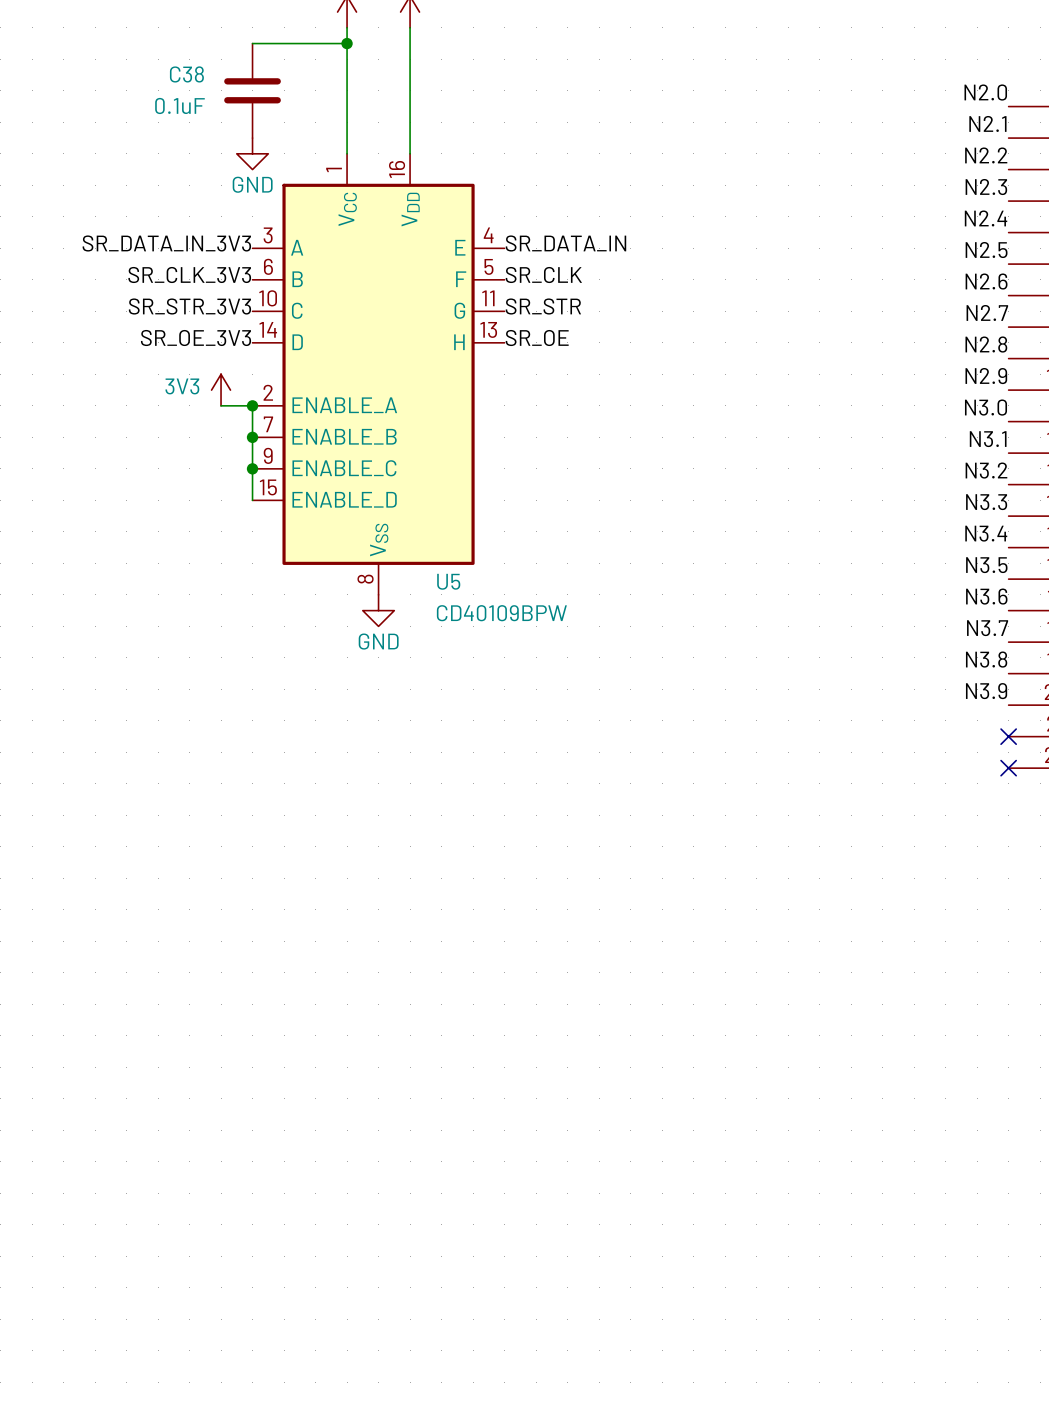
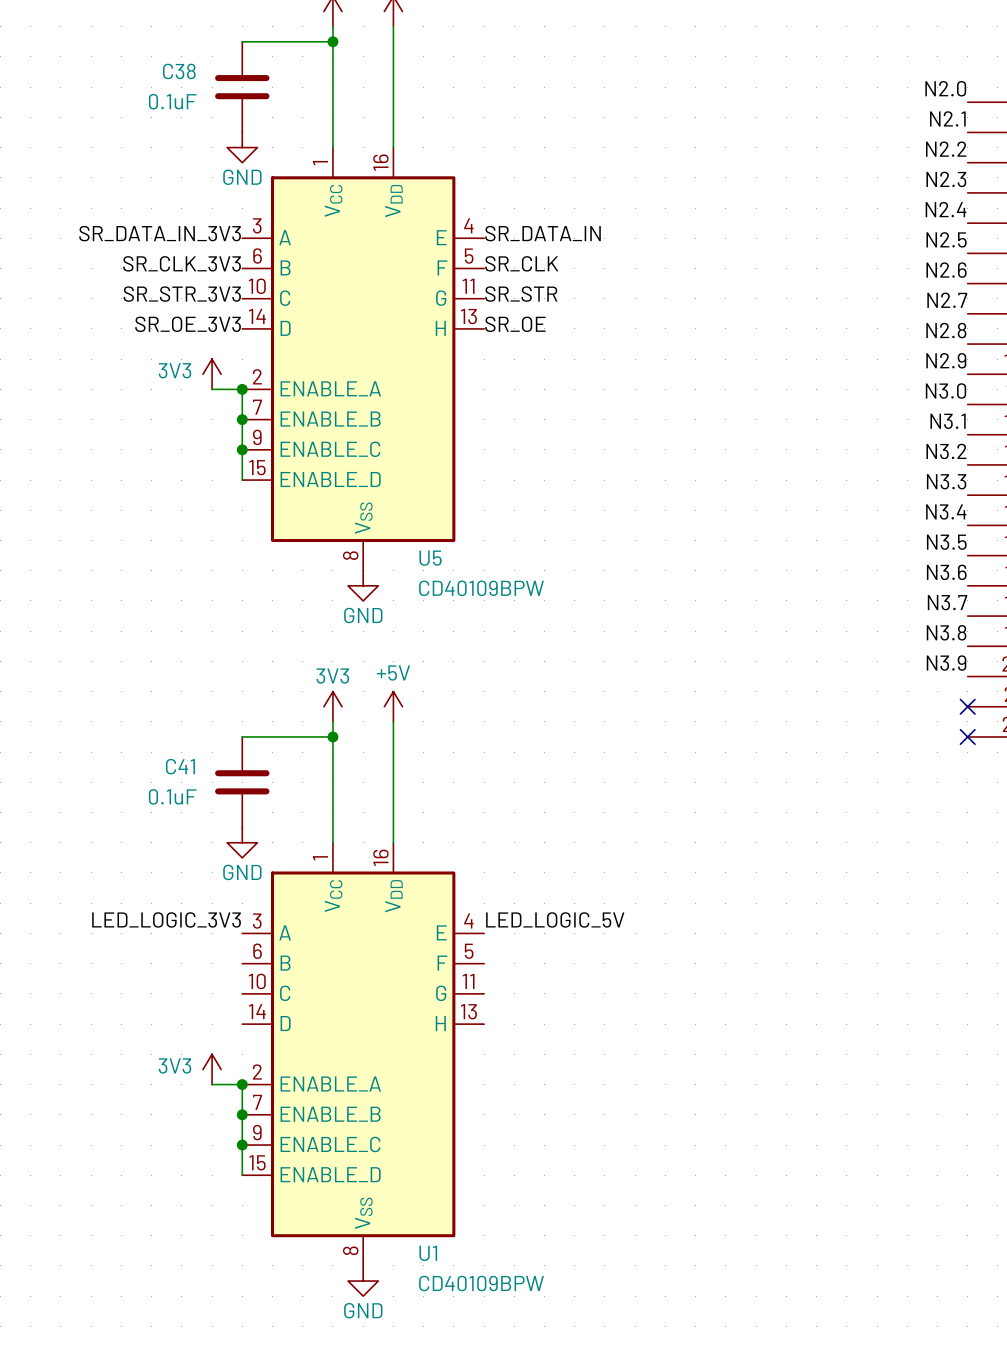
power symbol: none -> 3V3 (332, 706)
power symbol: none -> +5V (393, 706)
wire: none -> (332, 721) (332, 842)
wire: none -> (393, 721) (393, 842)
wire: none -> (242, 736) (332, 736)
junction: none -> (332, 736)
C41: none -> 0.1uF (242, 782)
power symbol: none -> GND (242, 842)
label: none -> LED_LOGIC_3V3 (166, 919)
label: none -> LED_LOGIC_5V (555, 919)
U1: none -> CD40109BPW (363, 1054)
power symbol: none -> 3V3 (212, 1069)
wire: none -> (212, 1084) (242, 1084) (242, 1175)
junction: none -> (242, 1084)
junction: none -> (242, 1114)
junction: none -> (242, 1145)
power symbol: none -> GND (363, 1281)

